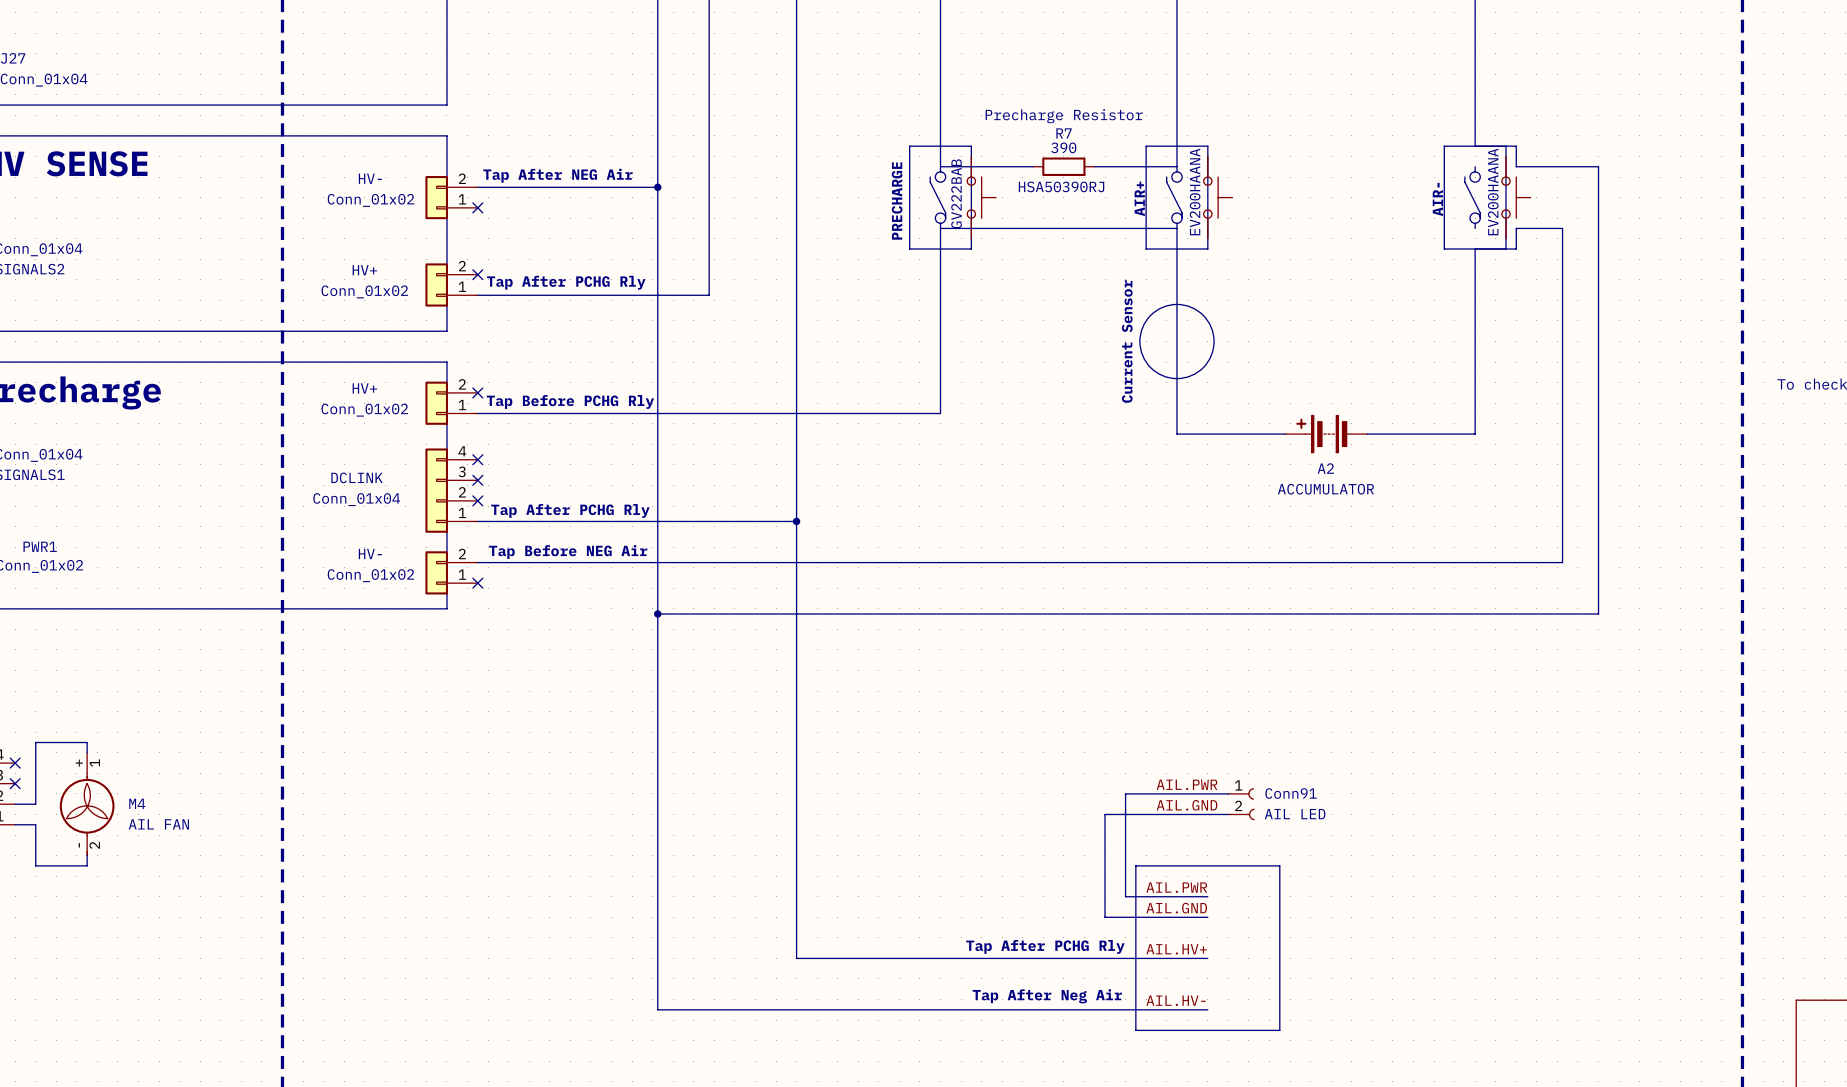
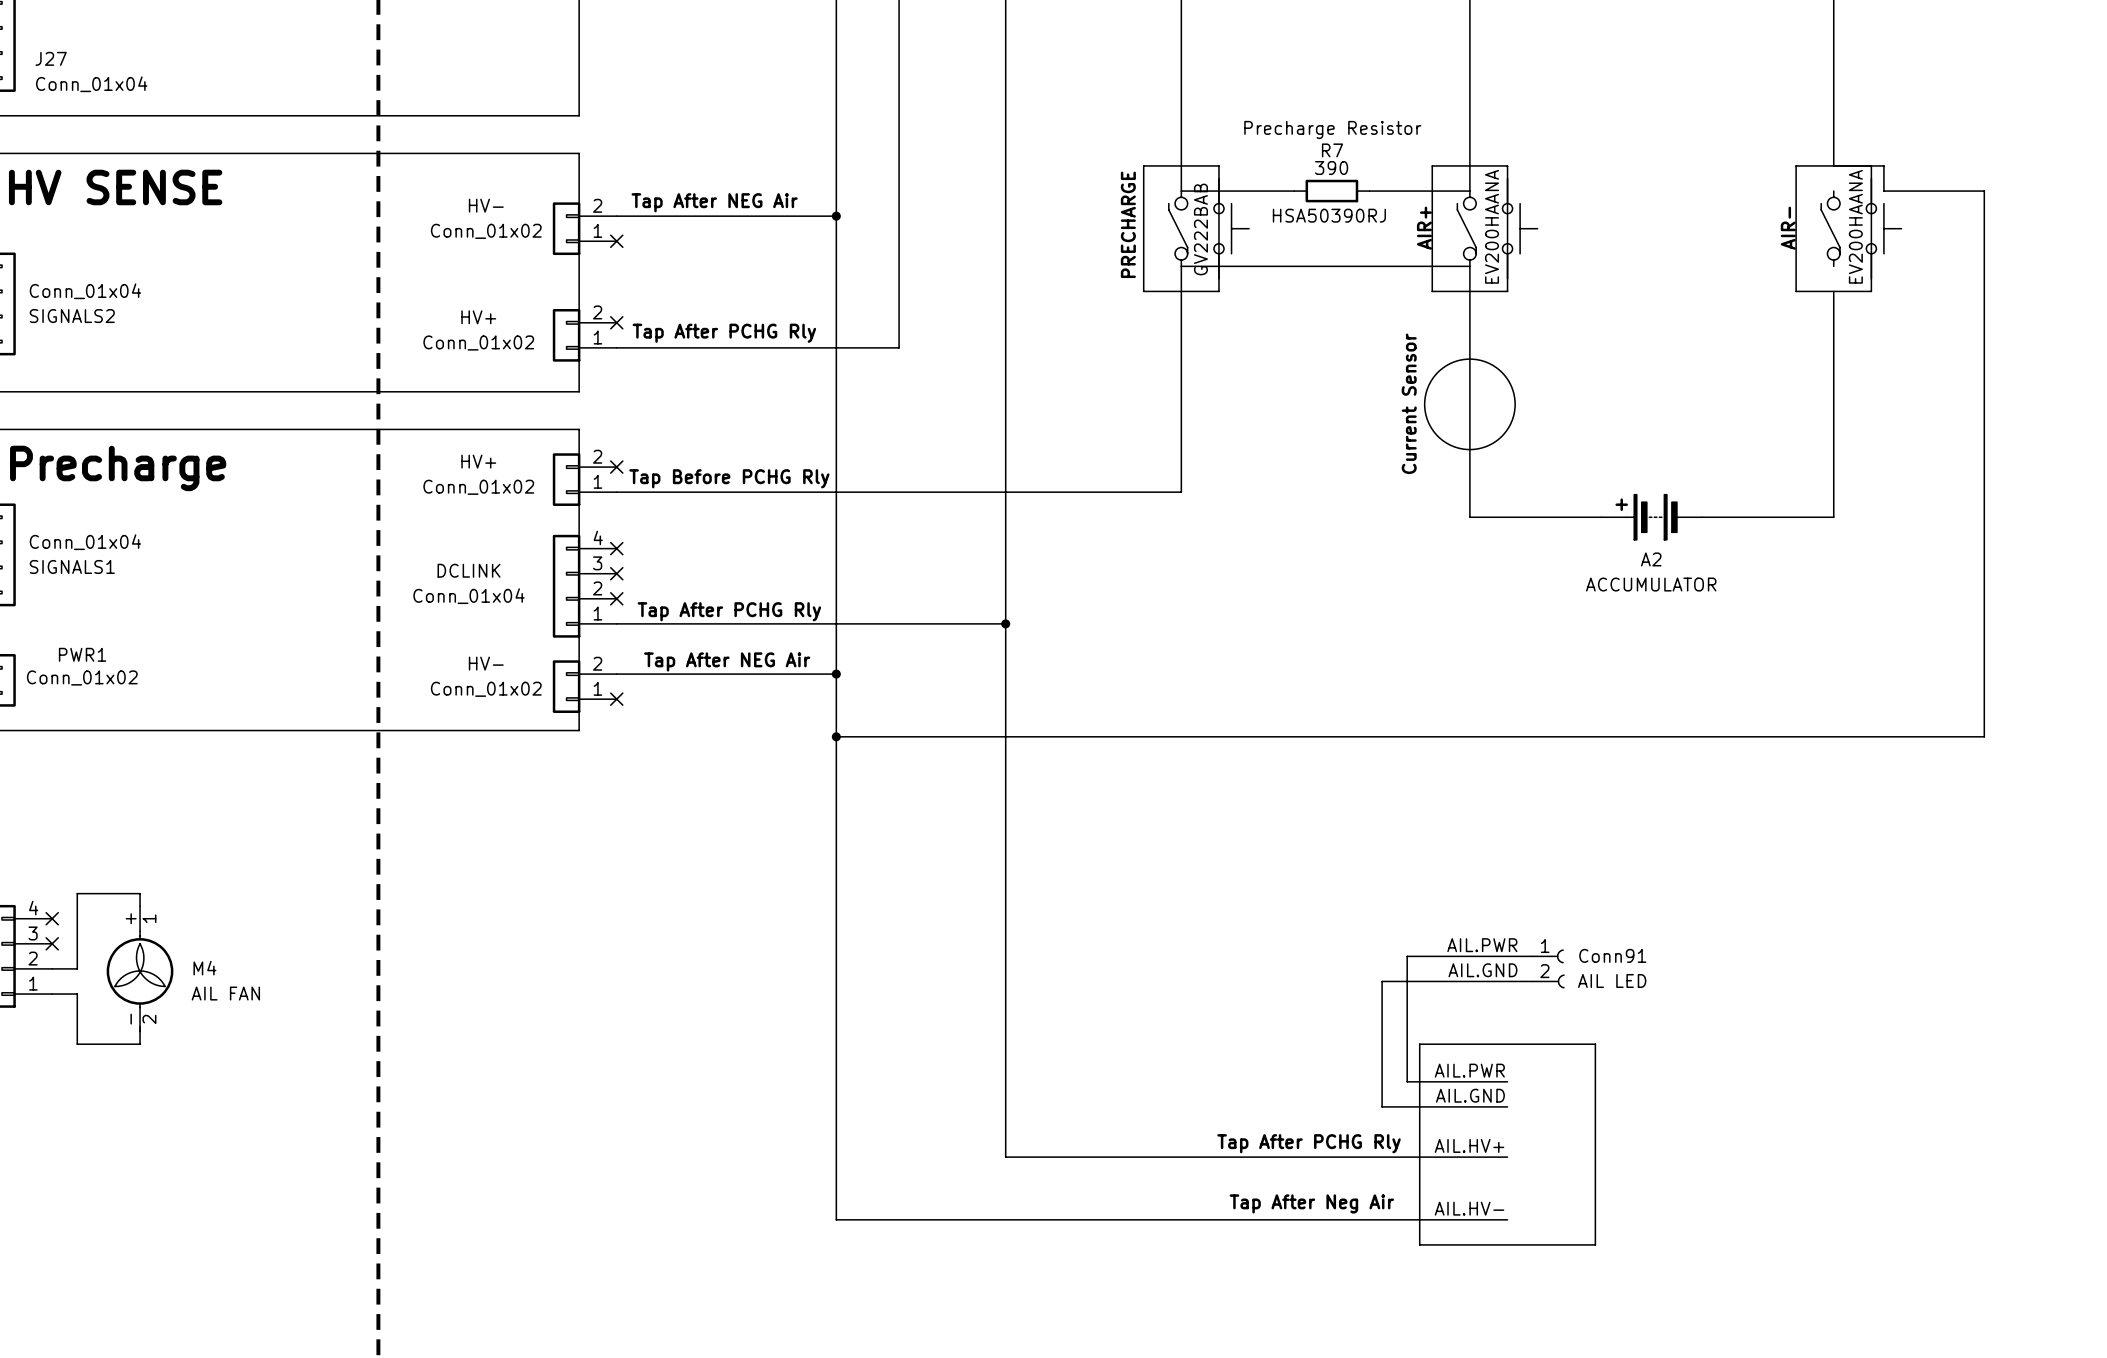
wire: (1475, 249) (1516, 249) (1516, 228) (1562, 228) (1562, 562) (657, 562) -> none
text: Tap Before NEG Air (568, 552) -> Tap After NEG Air (727, 661)
junction: none -> (836, 674)

